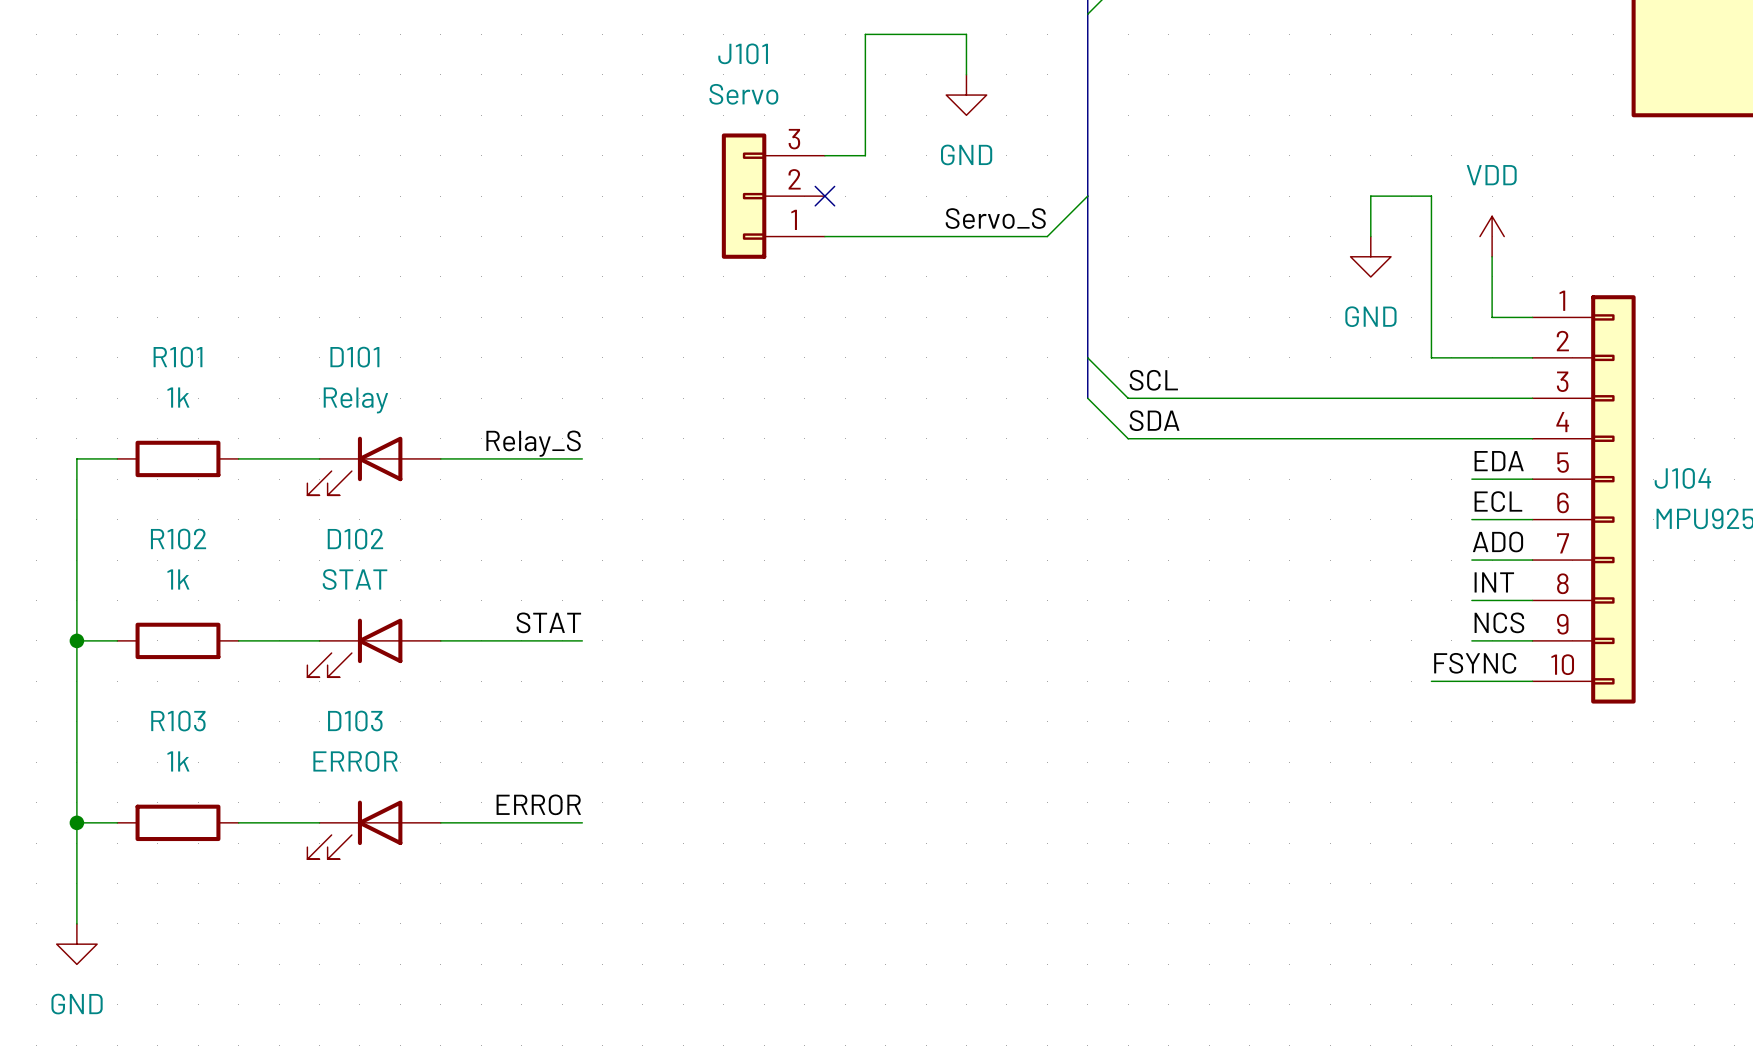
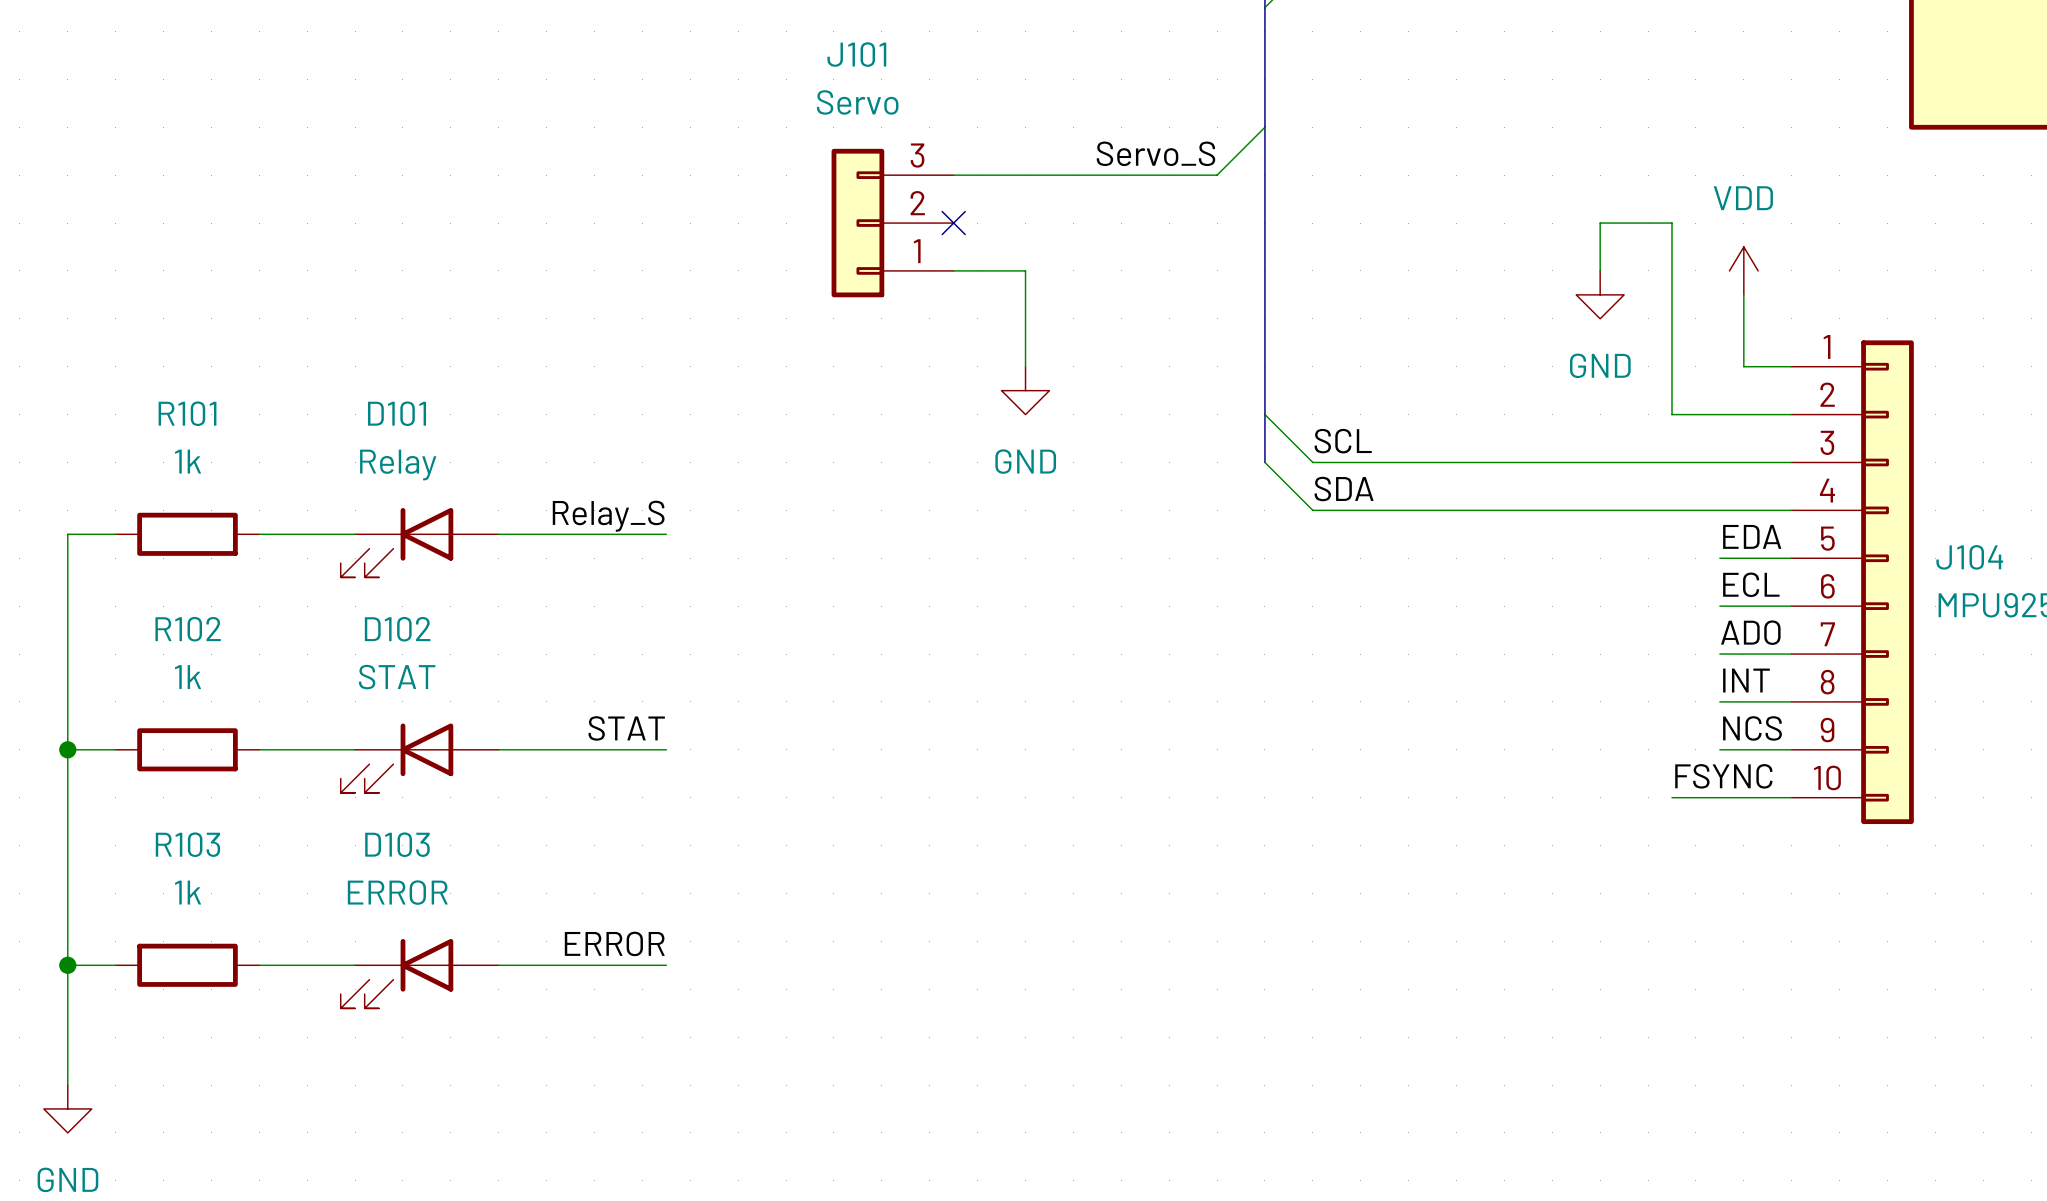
wire: (966, 74) (966, 34) (865, 34) (865, 155) -> (1264, 127) (1217, 175) (1001, 175)
power symbol position: GND (966, 95) -> GND (1025, 390)
wire: (1087, 196) (1047, 236) (885, 236) -> (1025, 366) (1025, 270)
label position: Servo_S (995, 218) -> Servo_S (1156, 153)

